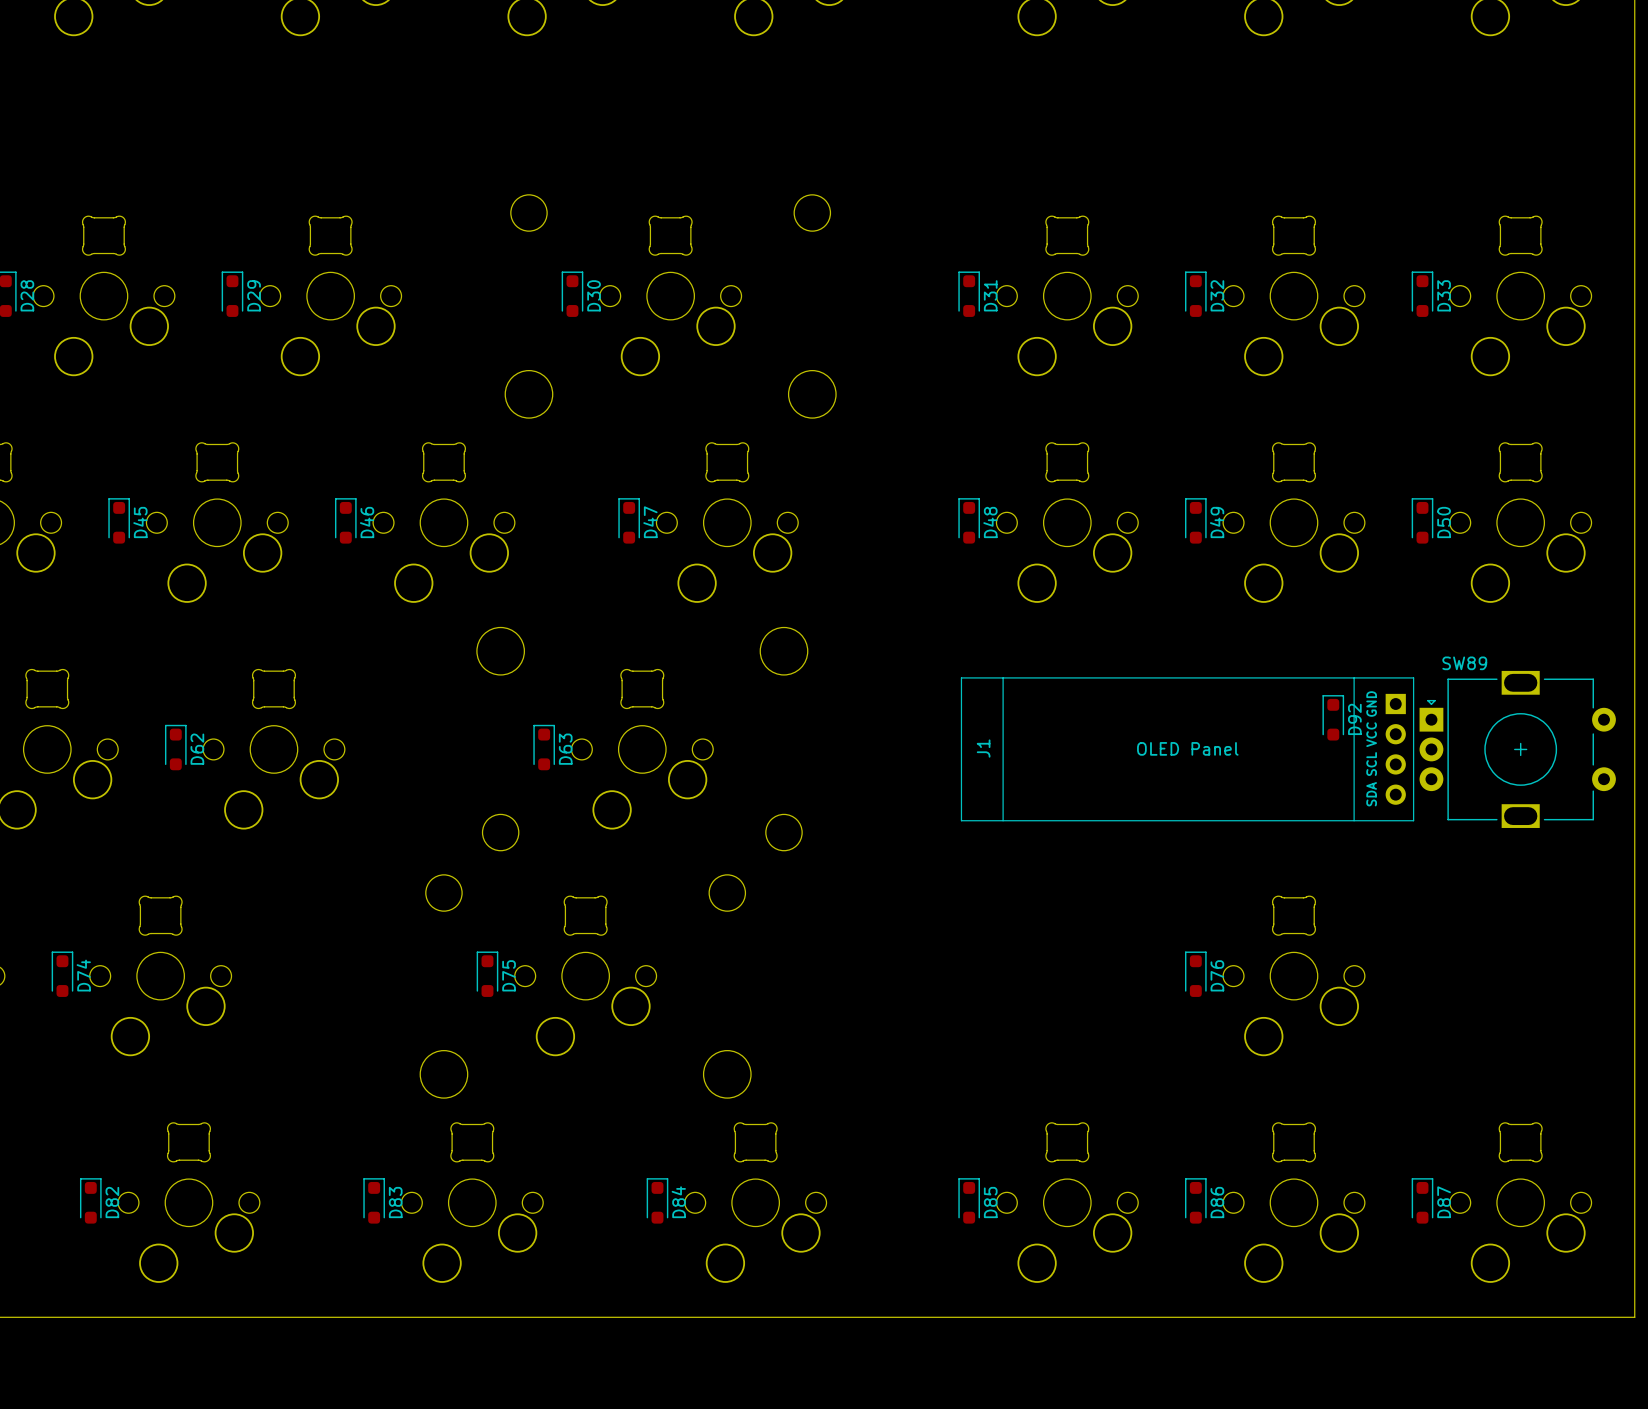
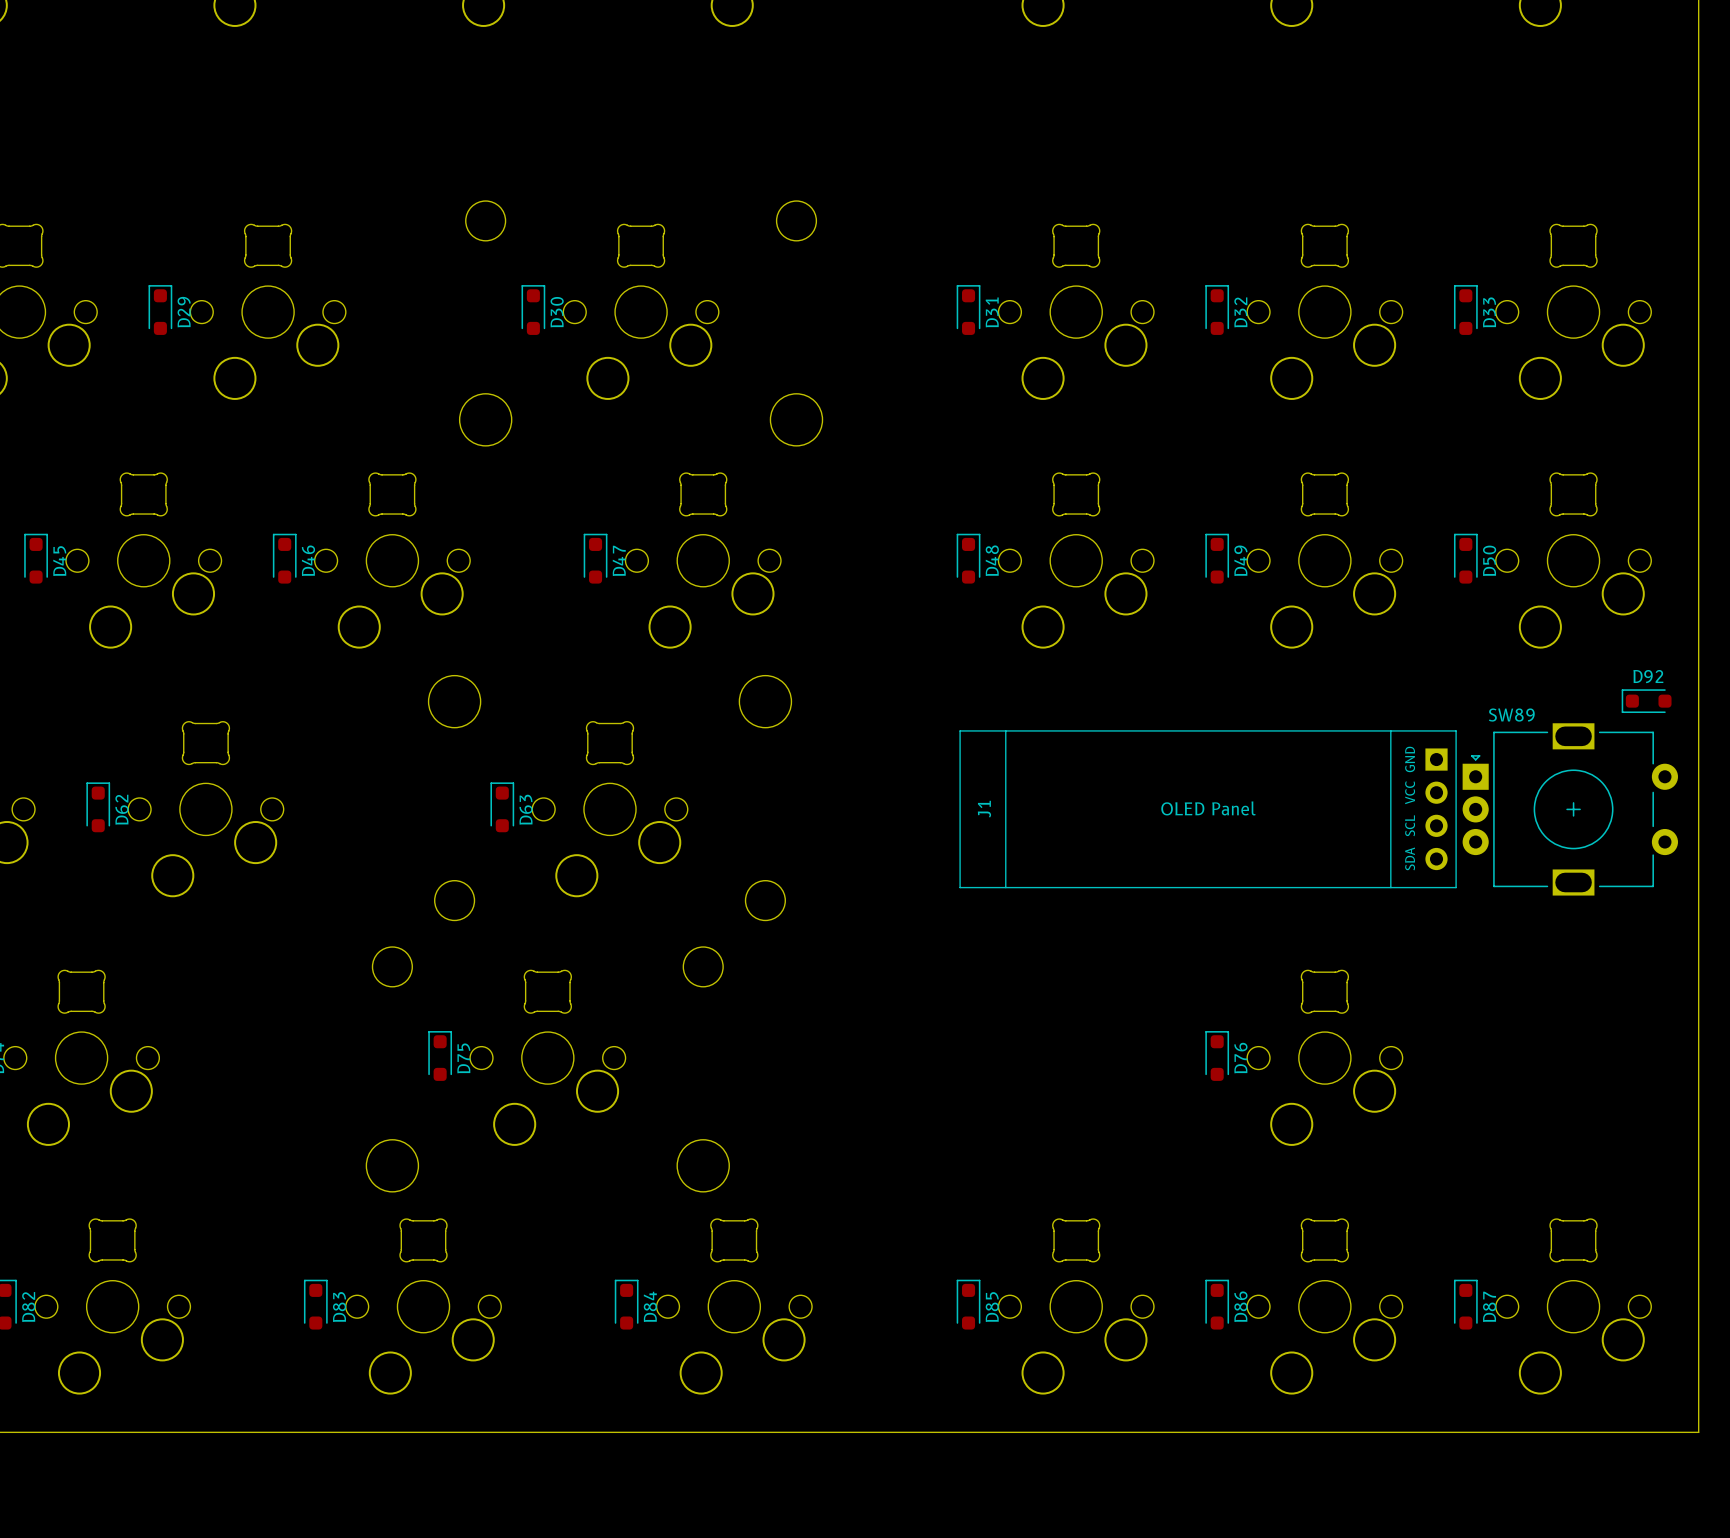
D92 rotation: 0° (1333, 717) -> 90° counterclockwise (1646, 701)
D92 position: (1333, 717) -> (1646, 701)

